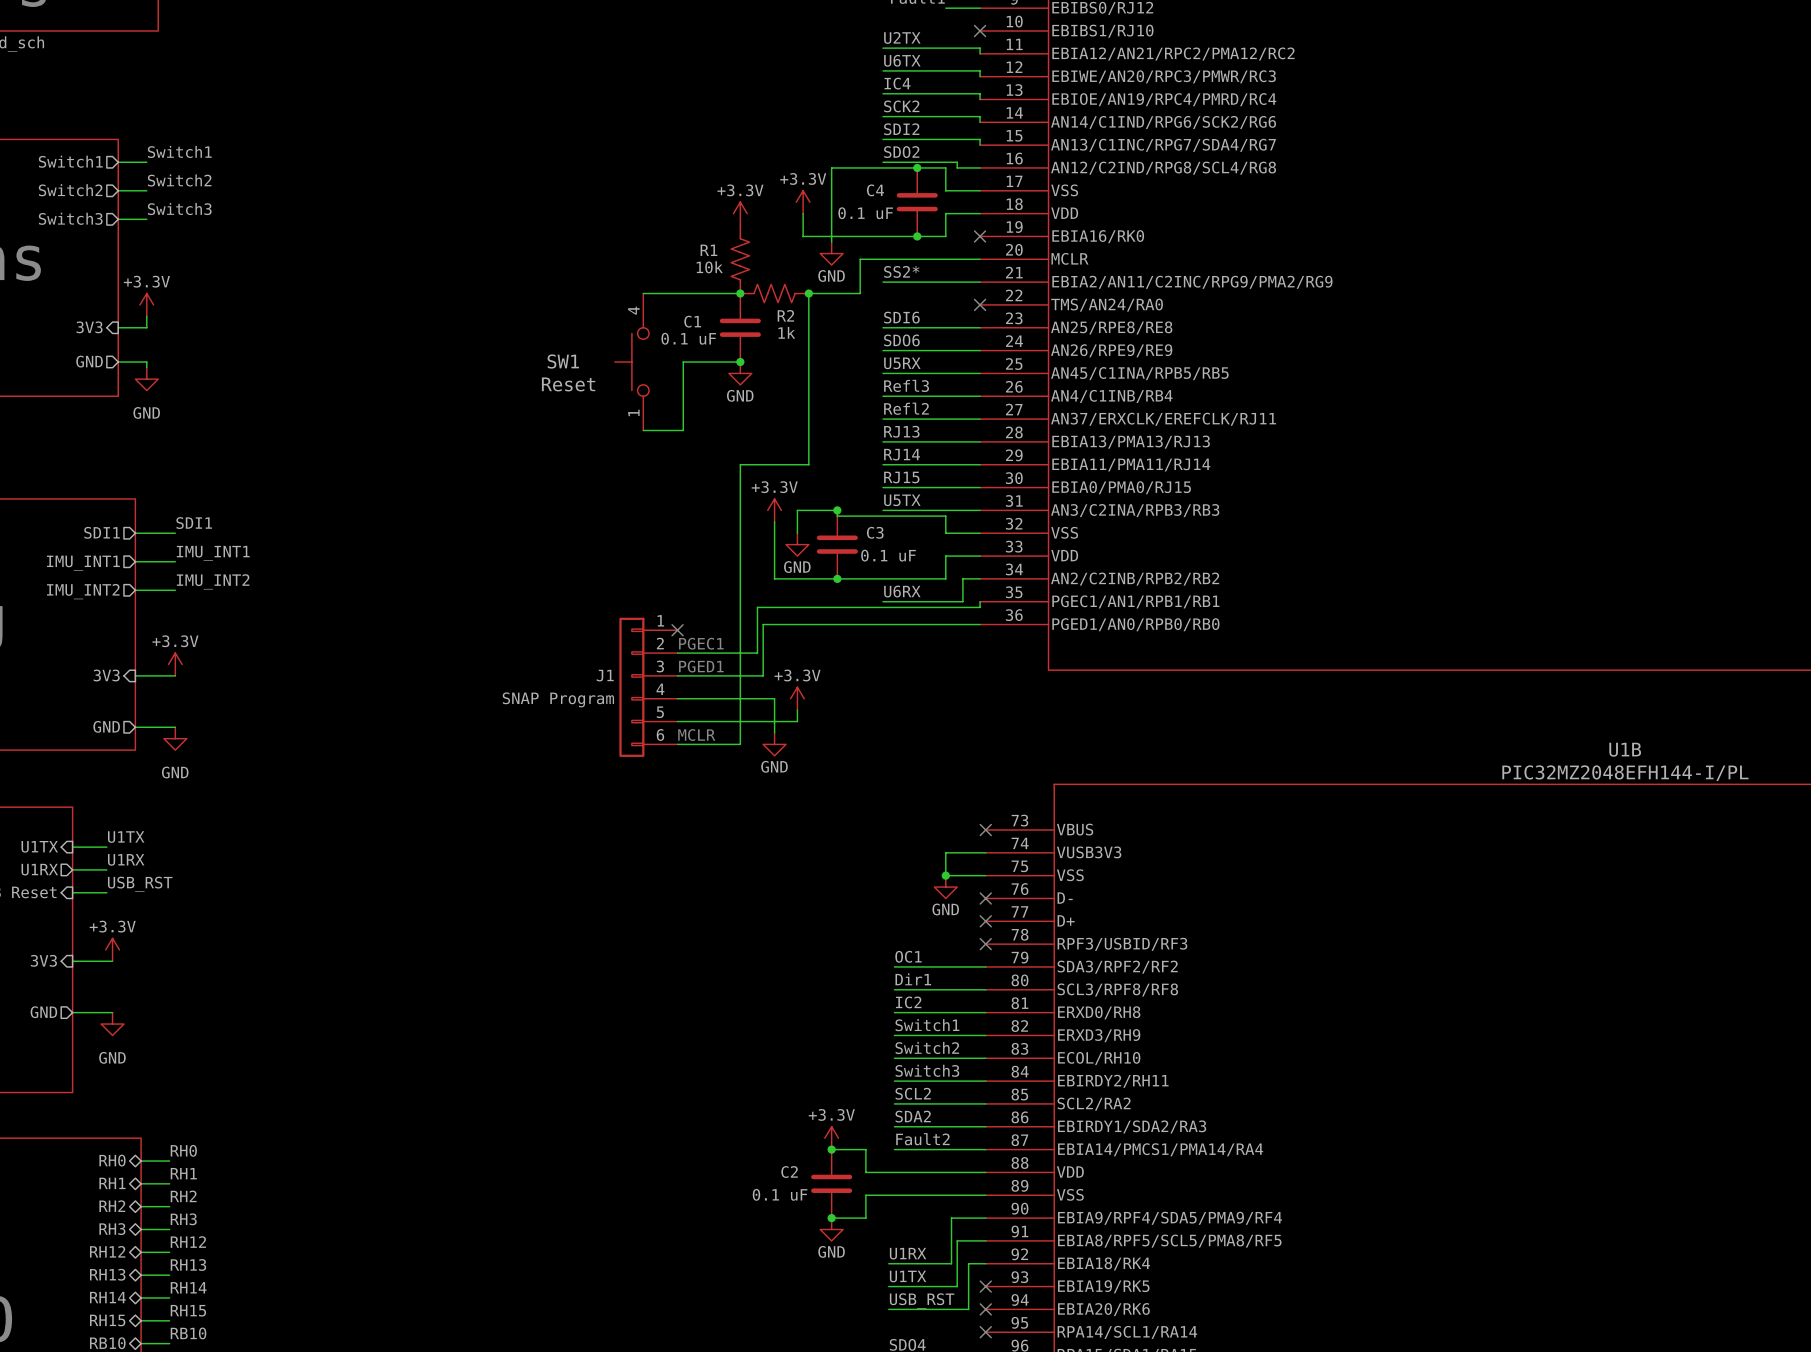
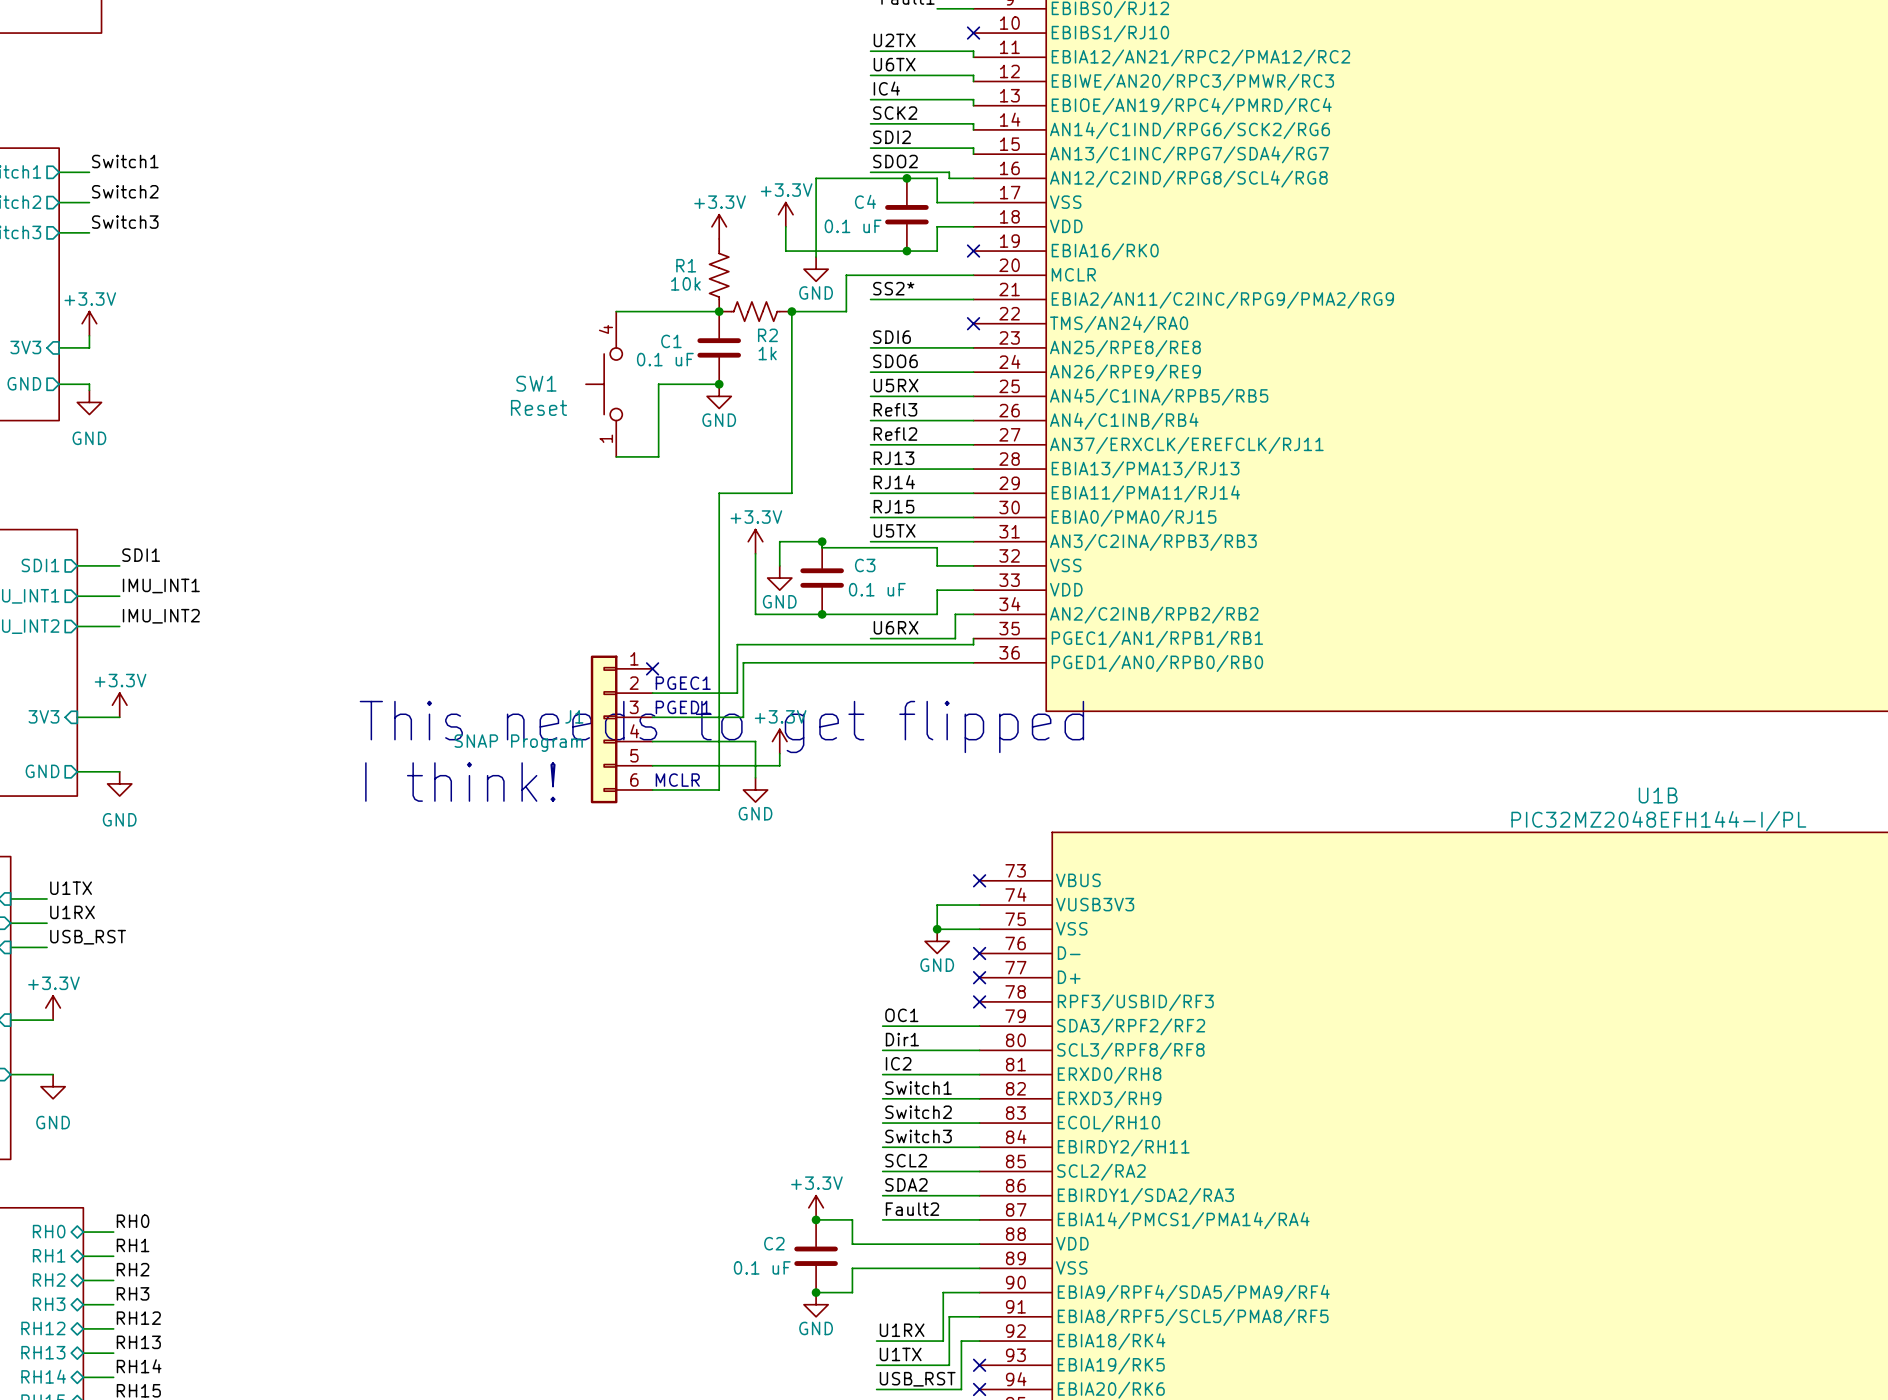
text: none -> This needs to get flipped (721, 726)
text: none -> I think! (460, 782)

